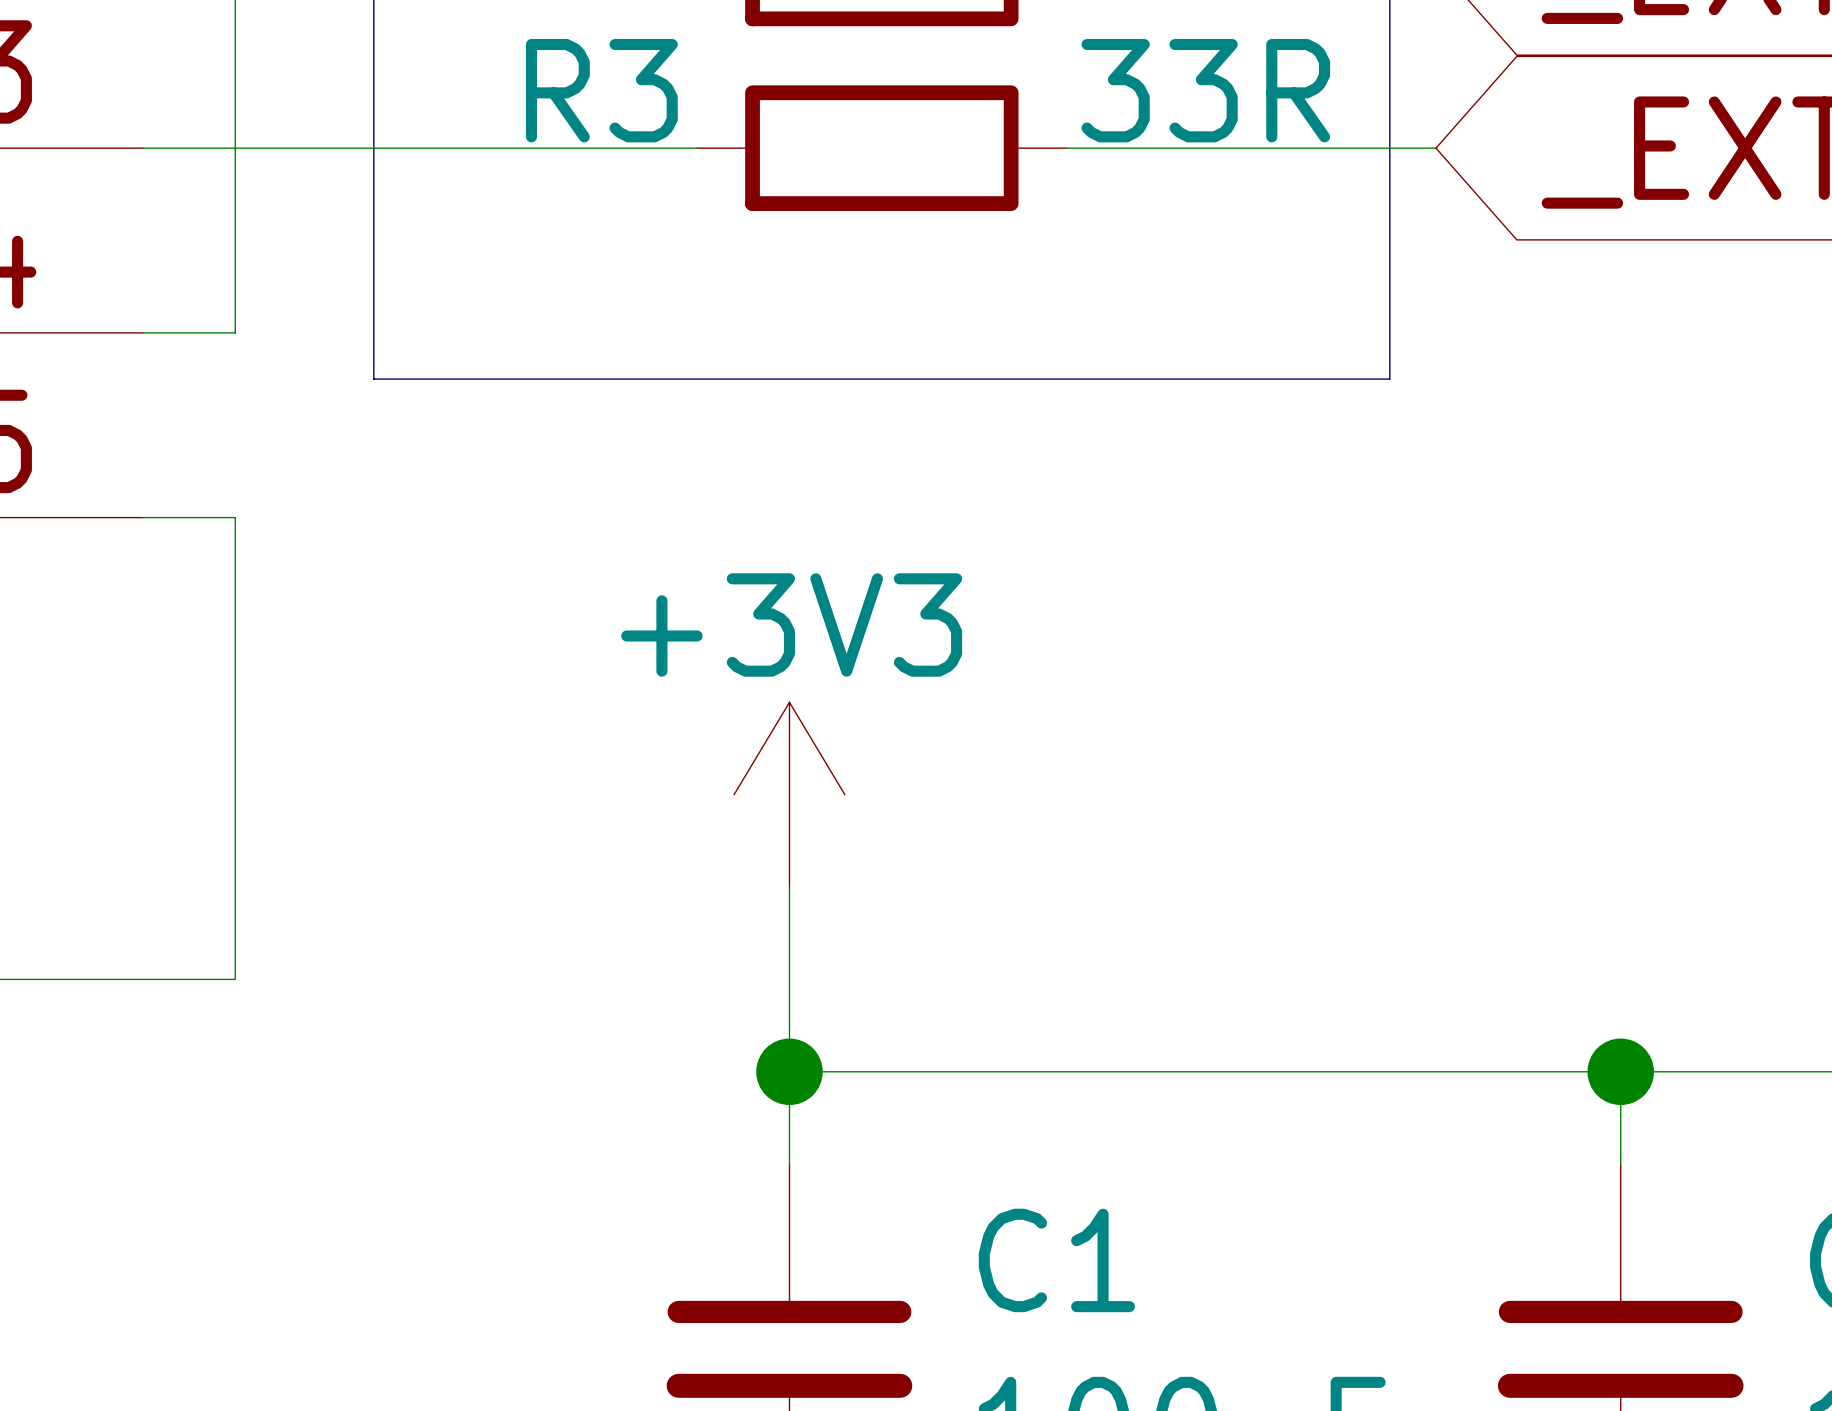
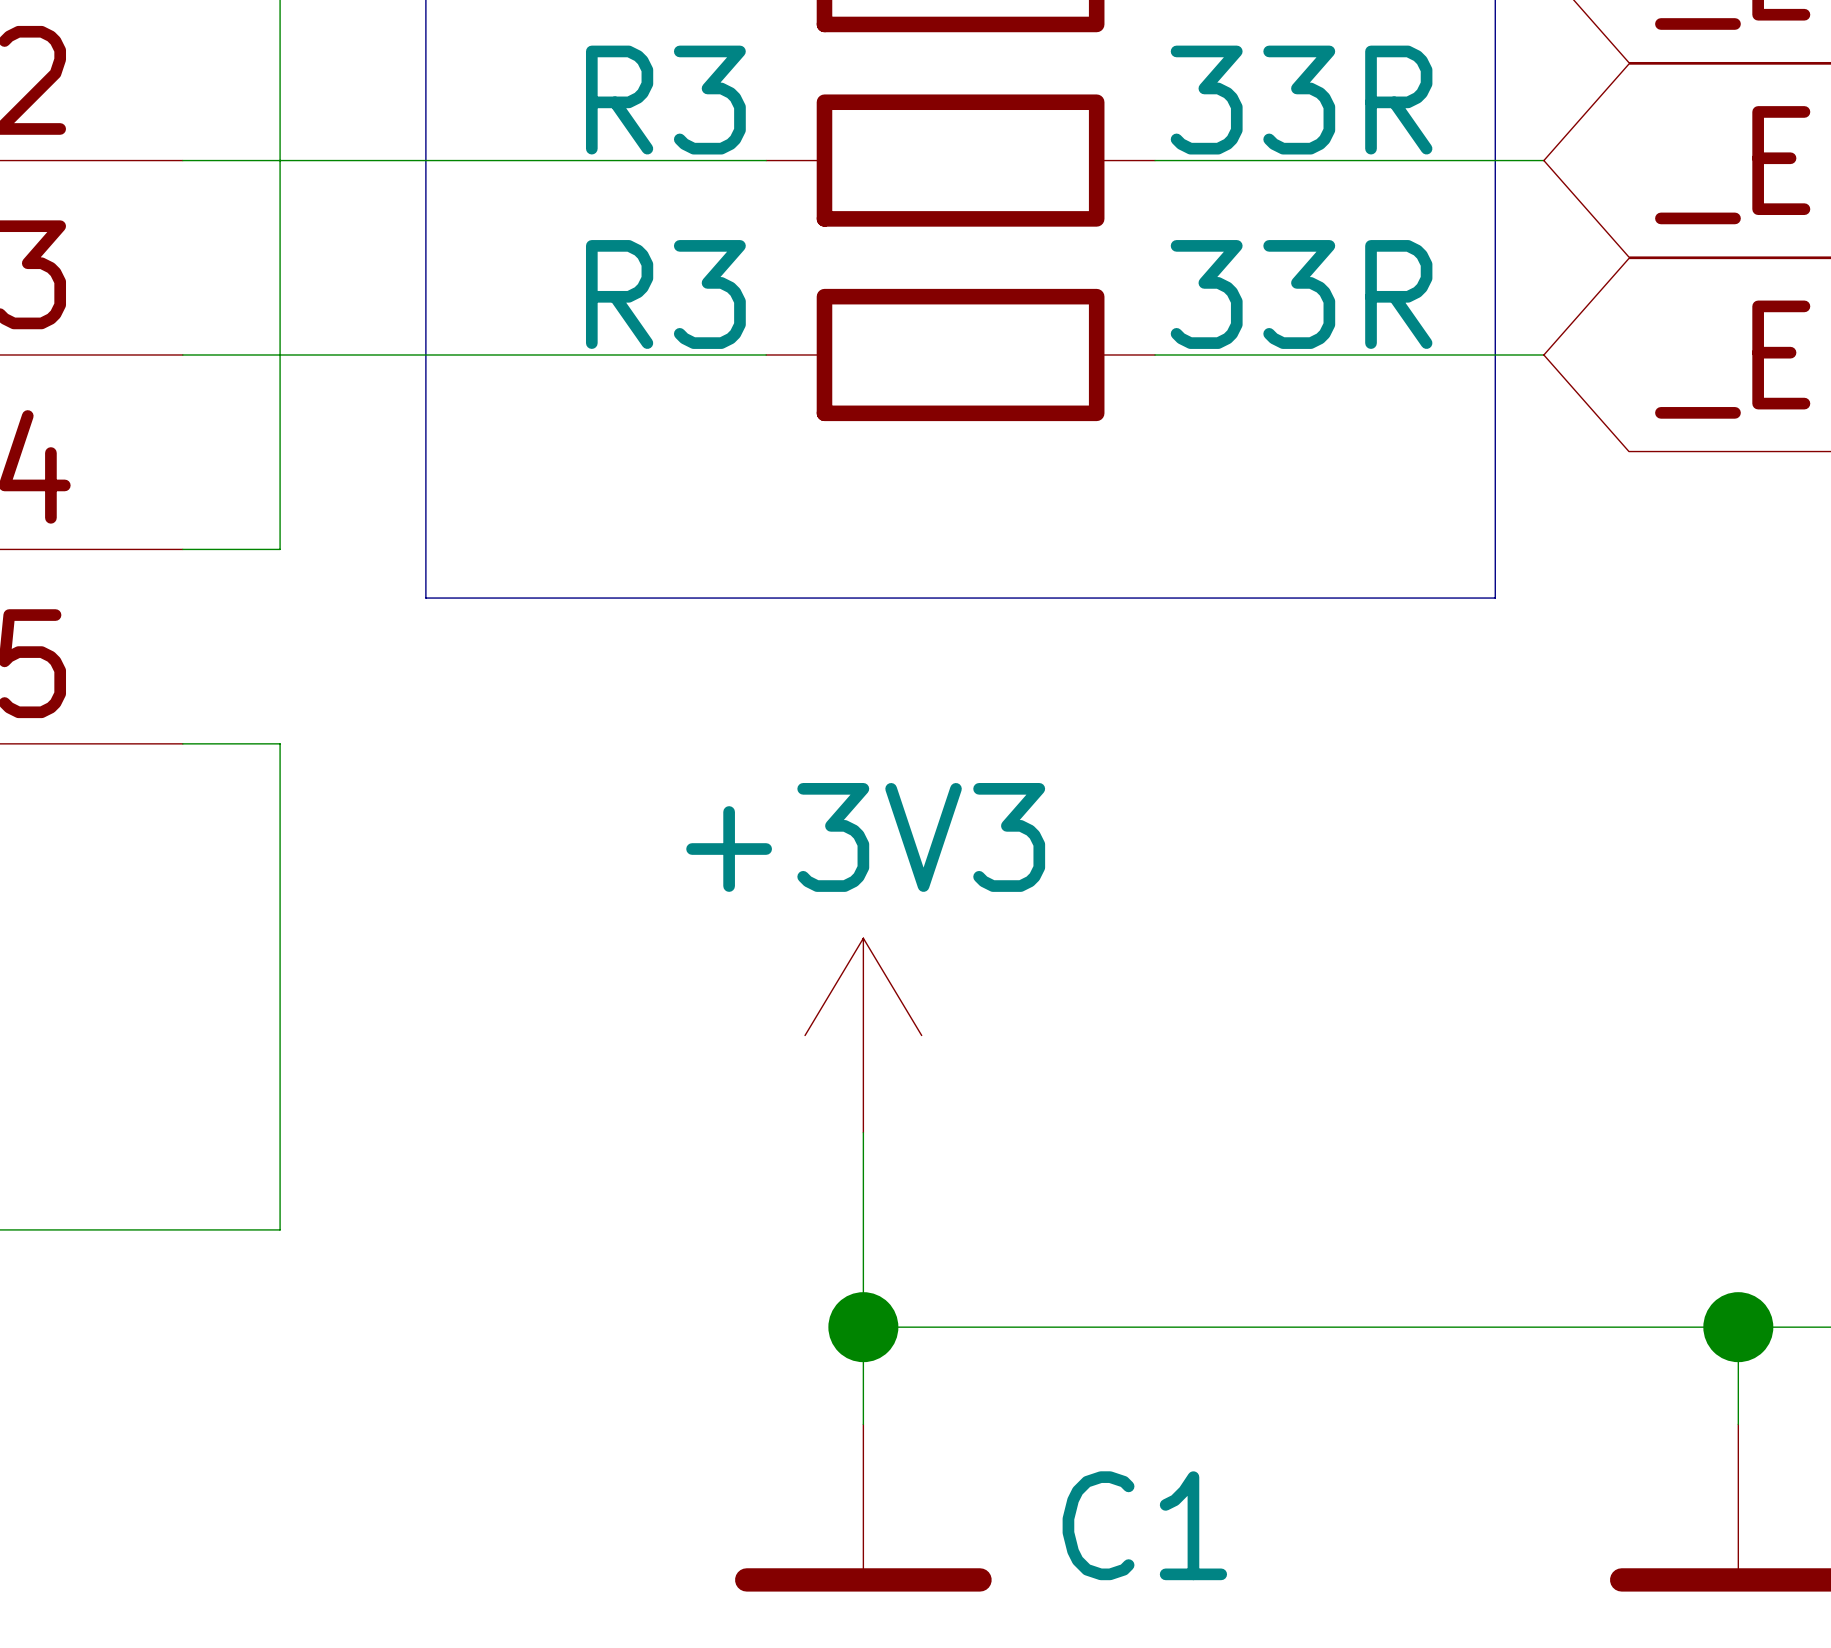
power symbol text position: +3V3 (791, 624) -> +3V3 (865, 837)

